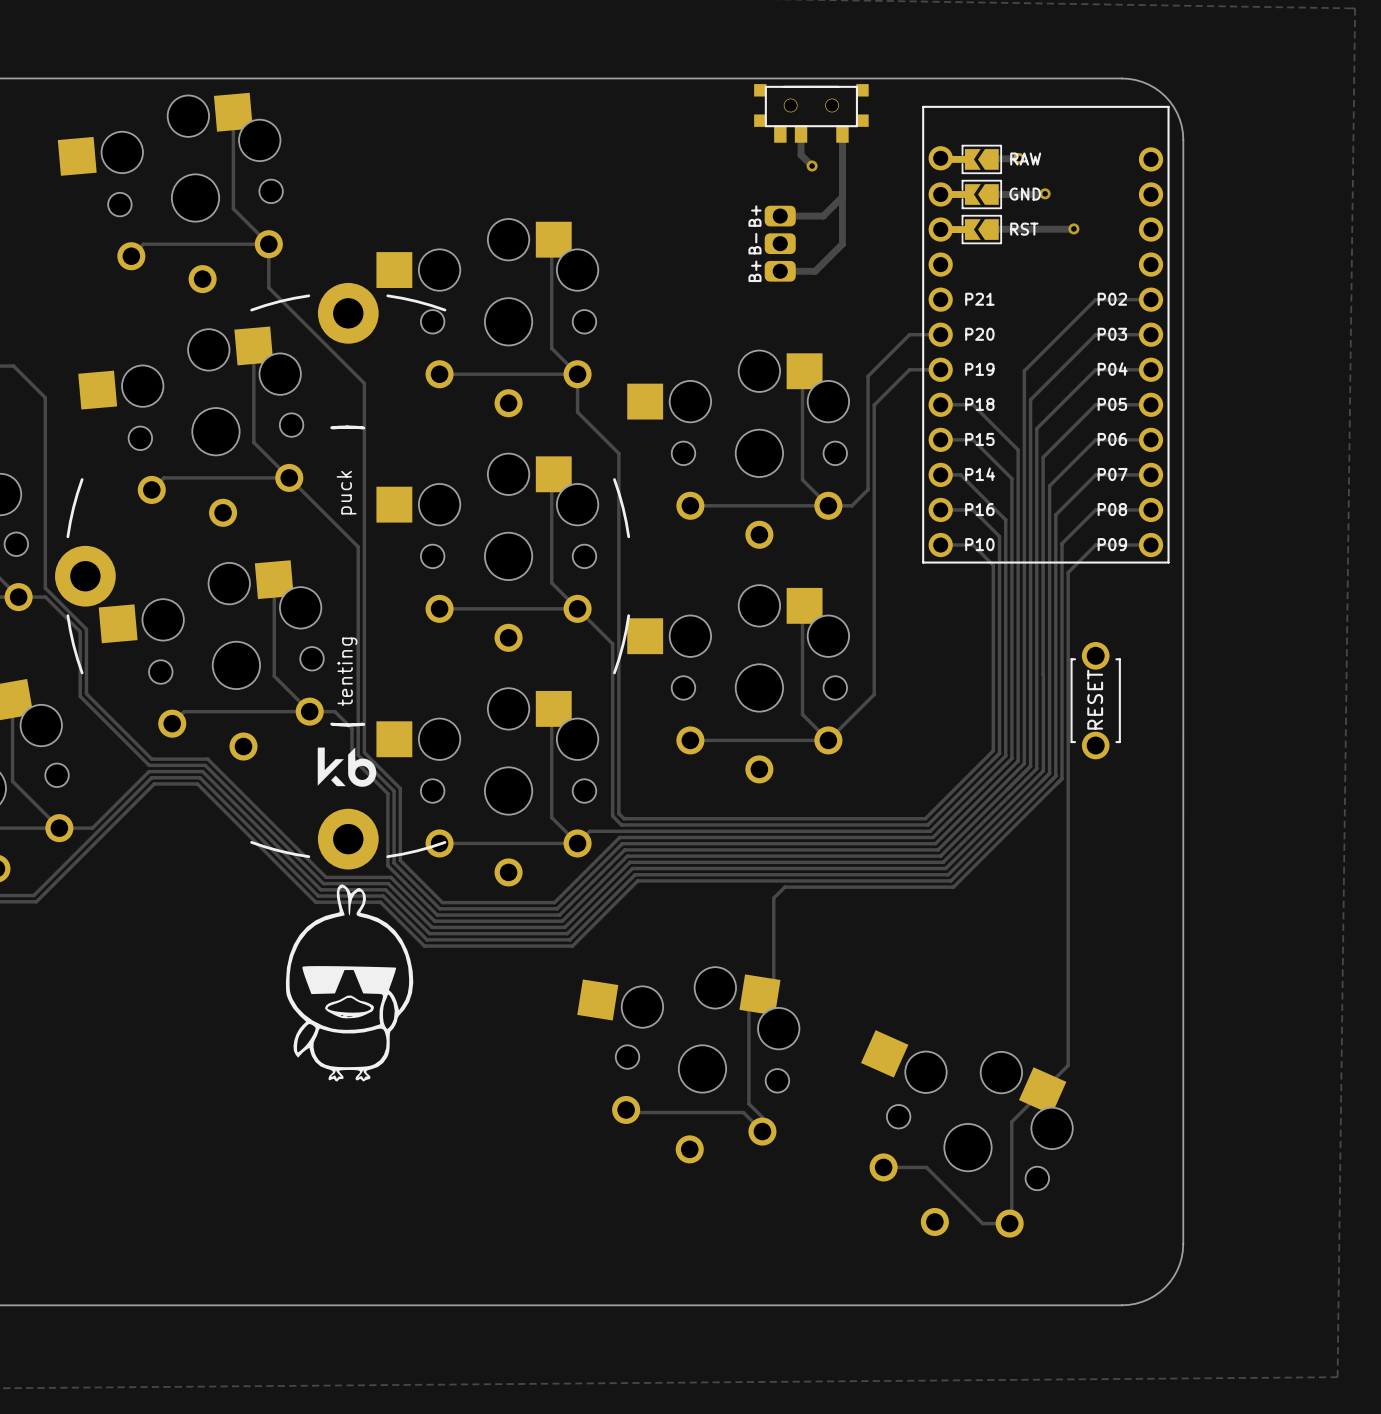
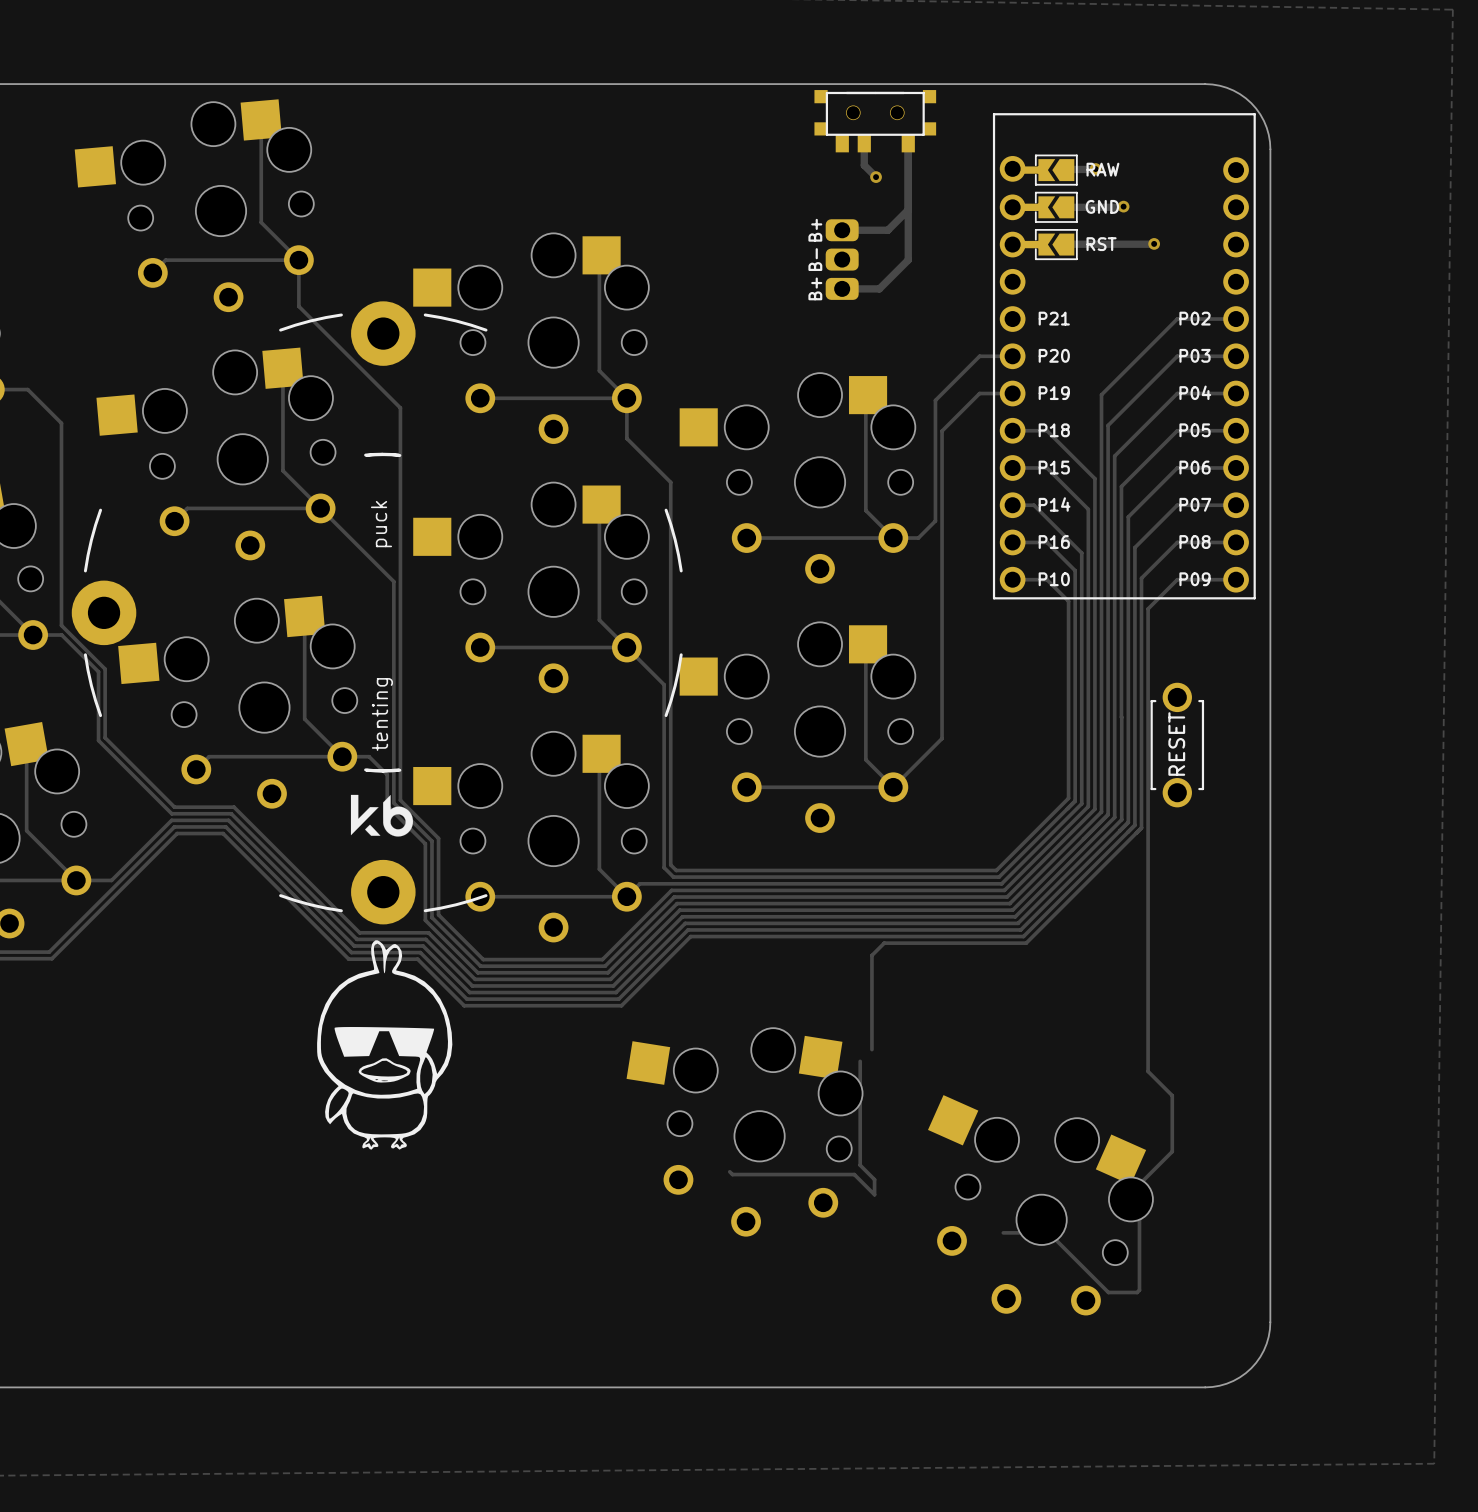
track: (819, 887) (784, 887) (773, 898) (773, 994) (762, 1005) -> (884, 943) (871, 955) (871, 1049)
track: (748, 1005) (748, 1103) (762, 1117) (762, 1131) (743, 1112) (628, 1112) (626, 1109) -> (860, 1061) (860, 1165) (874, 1179) (874, 1194) (854, 1174) (732, 1174) (729, 1171)
track: (1068, 1007) (1068, 1065) (1011, 1121) (1011, 1221) (1009, 1223) (982, 1223) (926, 1167) (883, 1167) -> (1148, 1071) (1172, 1095) (1172, 1151) (1139, 1184) (1139, 1290) (1137, 1292) (1108, 1292) (1048, 1232) (1003, 1232)

